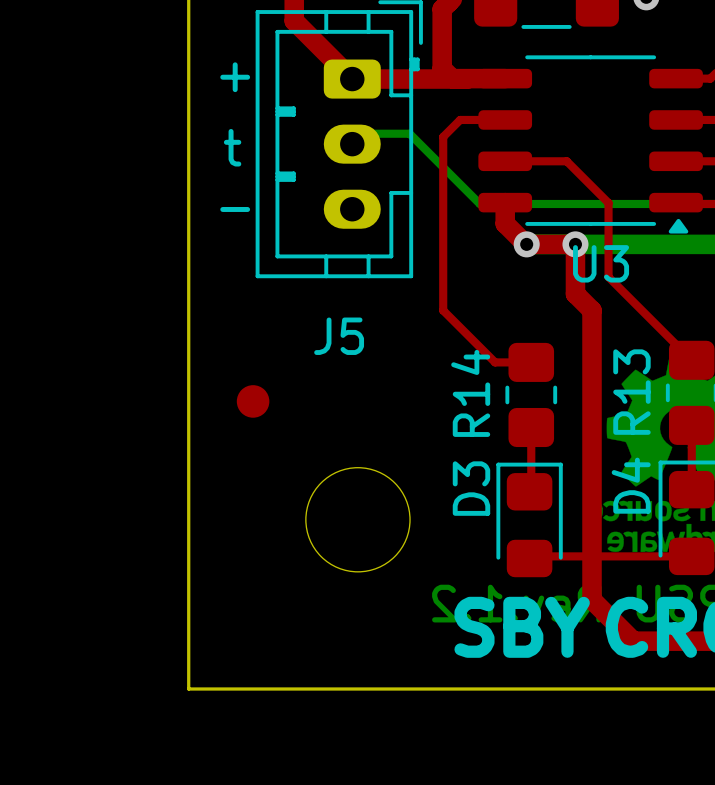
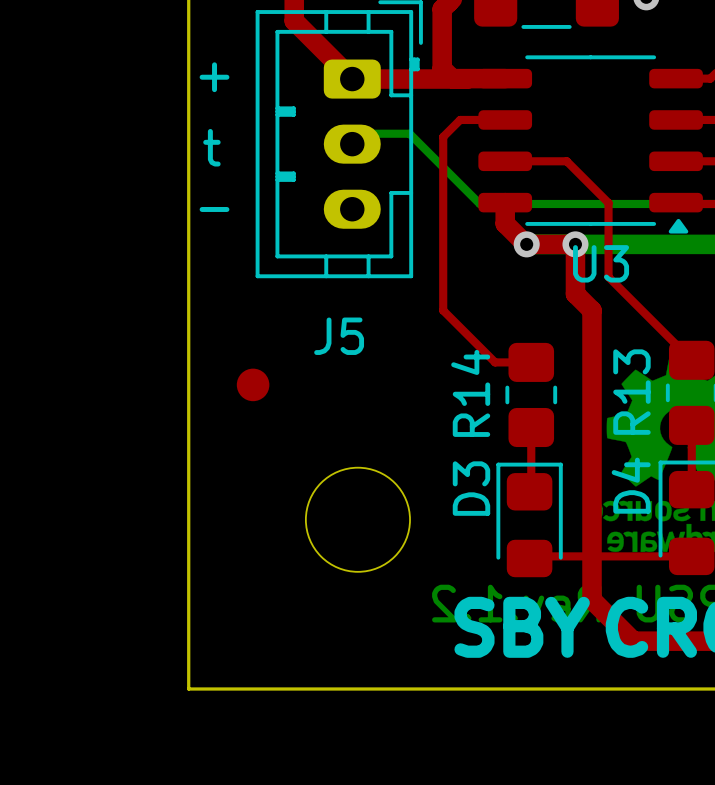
text position: + (235, 77) -> + (214, 77)
text position: t (232, 147) -> t (211, 147)
text position: - (235, 209) -> - (214, 209)
part position: (253, 401) -> (253, 384)

